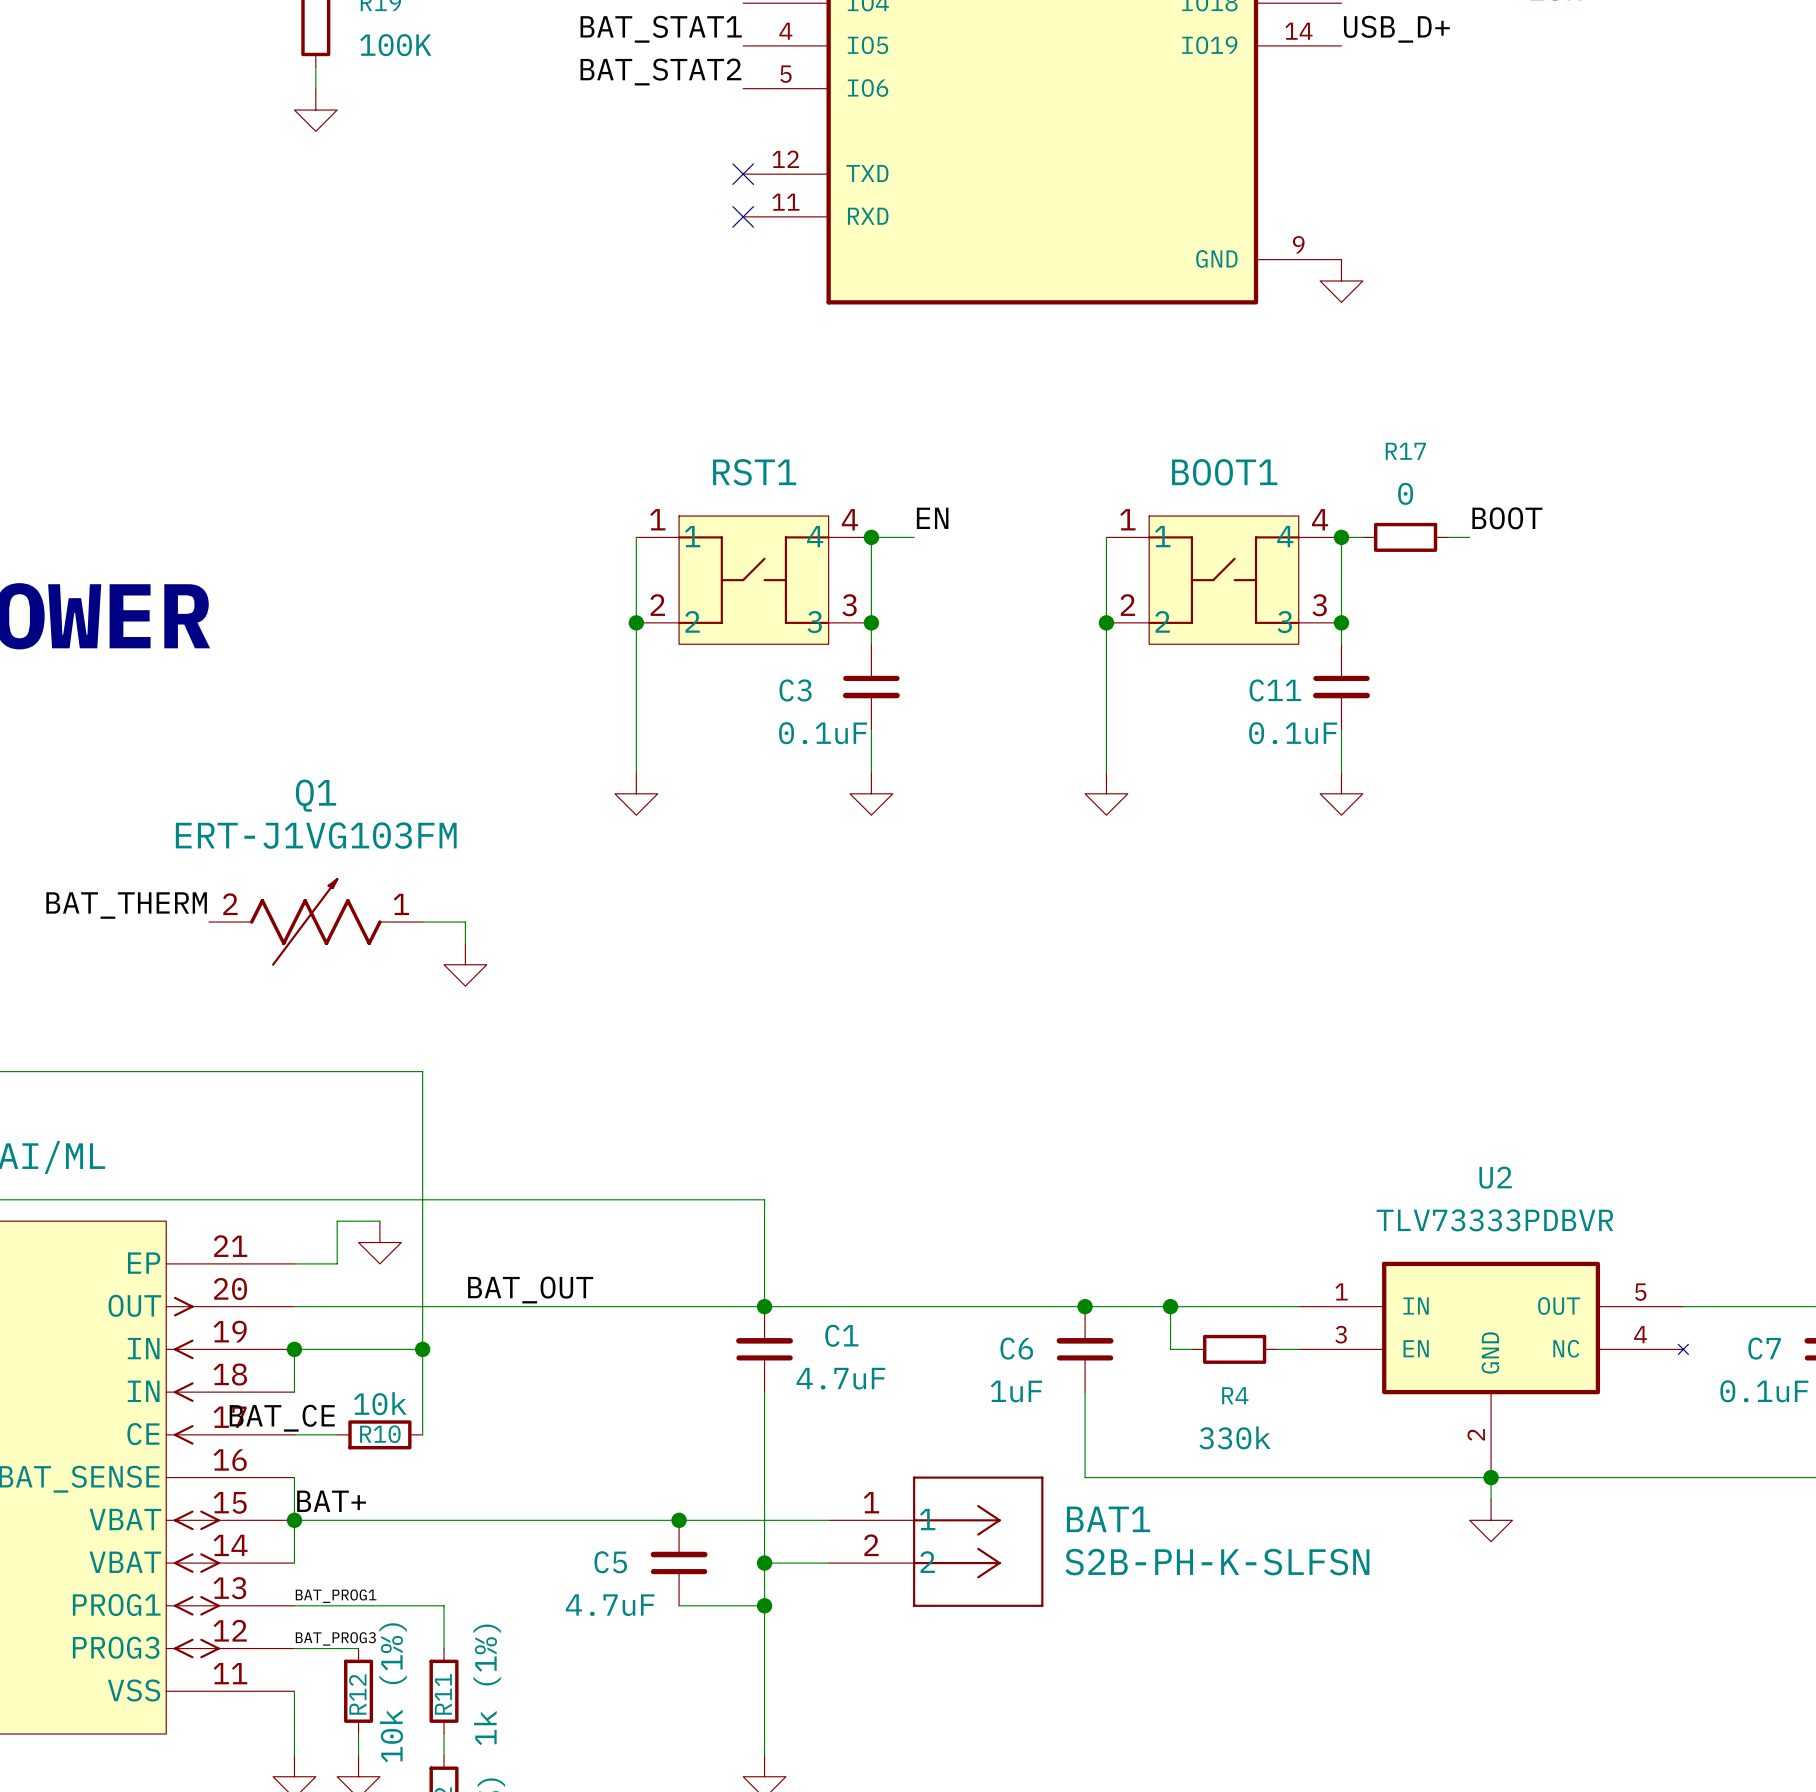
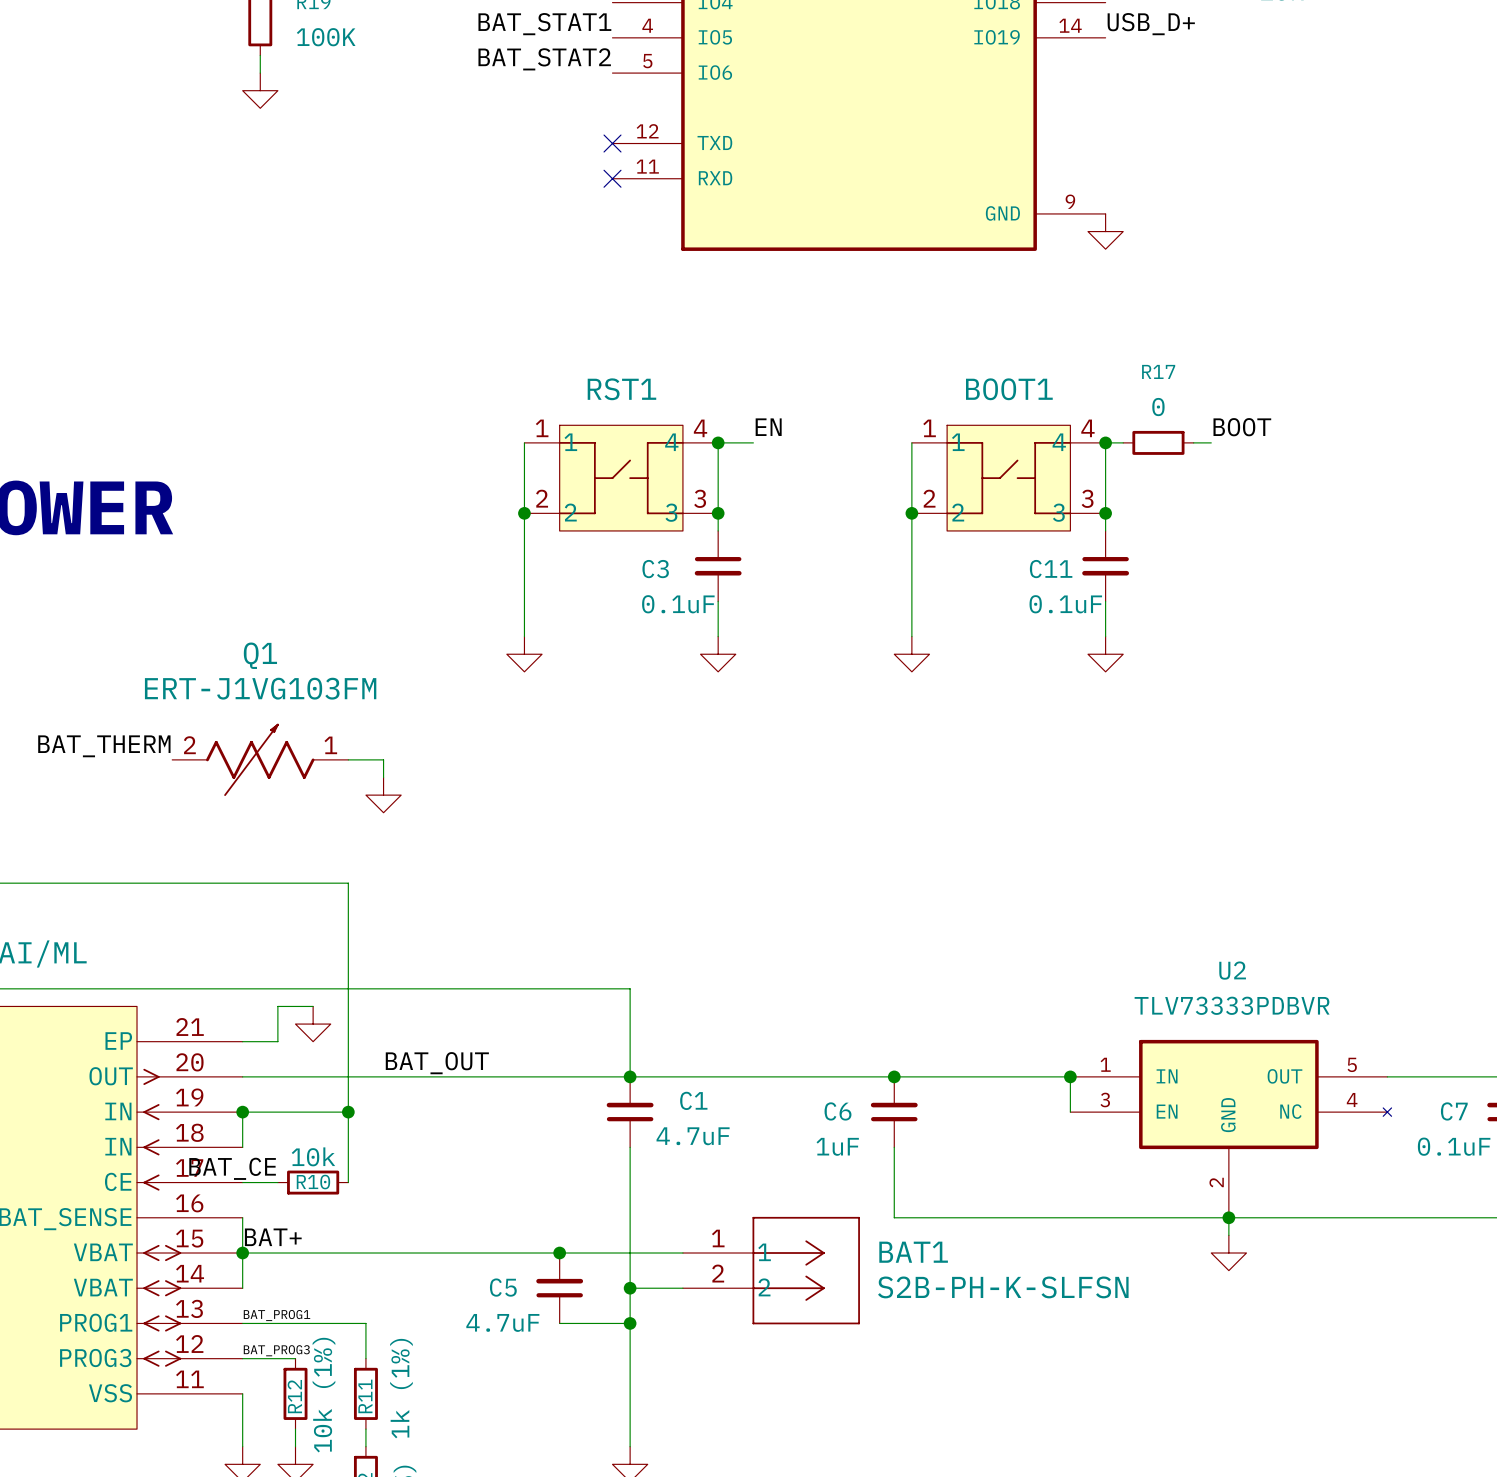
wire: (1170, 1306) (1170, 1349) (1191, 1349) -> none
junction: (1170, 1306) -> none
junction: none -> (1070, 1076)
R4: 330k (1234, 1349) -> none
wire: (1277, 1349) (1298, 1349) -> (1070, 1076) (1070, 1112)

